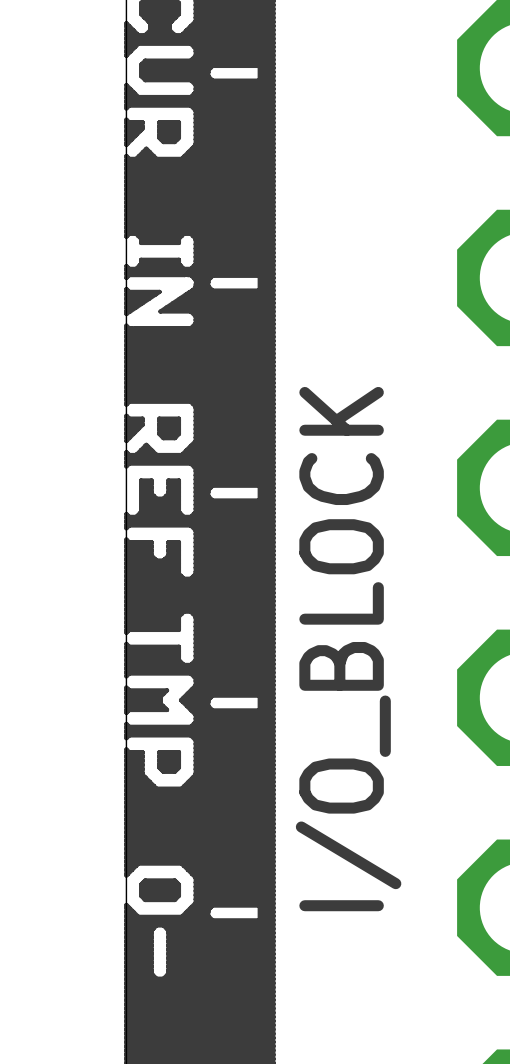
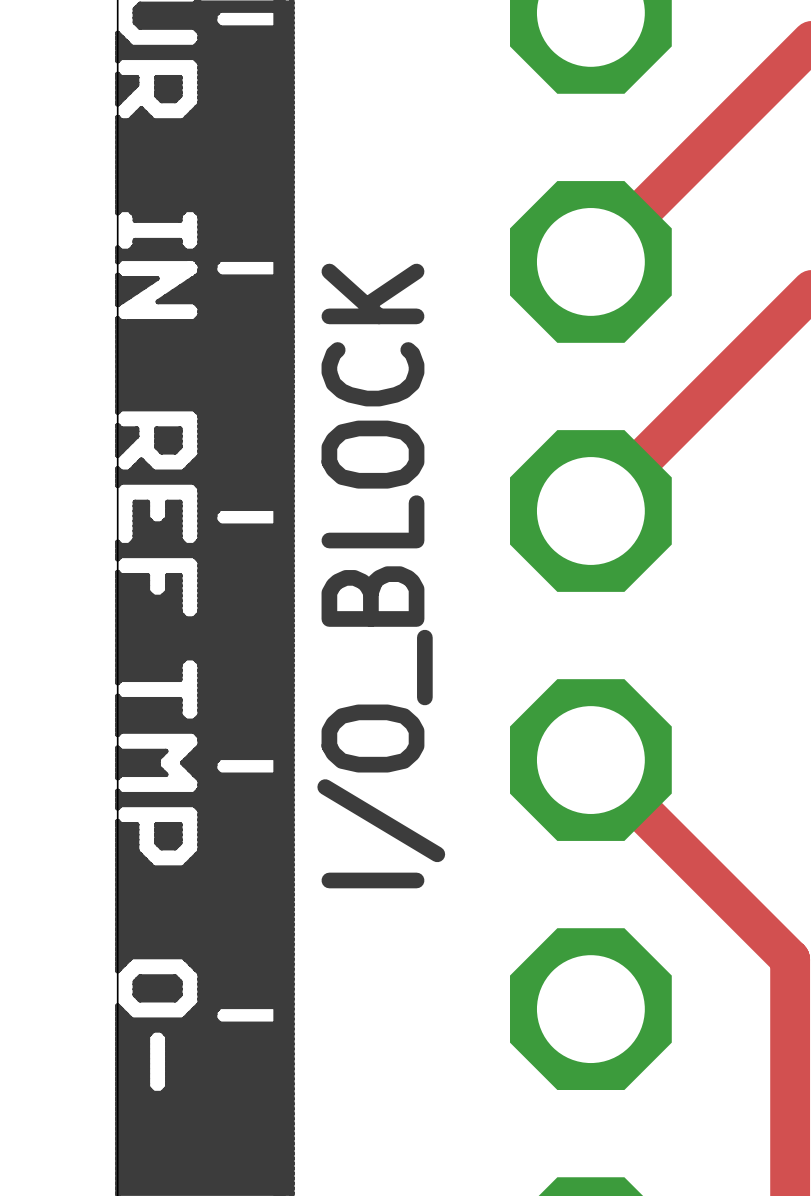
I/O_BLOCK name position: I/O_BLOCK (348, 649) -> I/O_BLOCK (381, 576)

